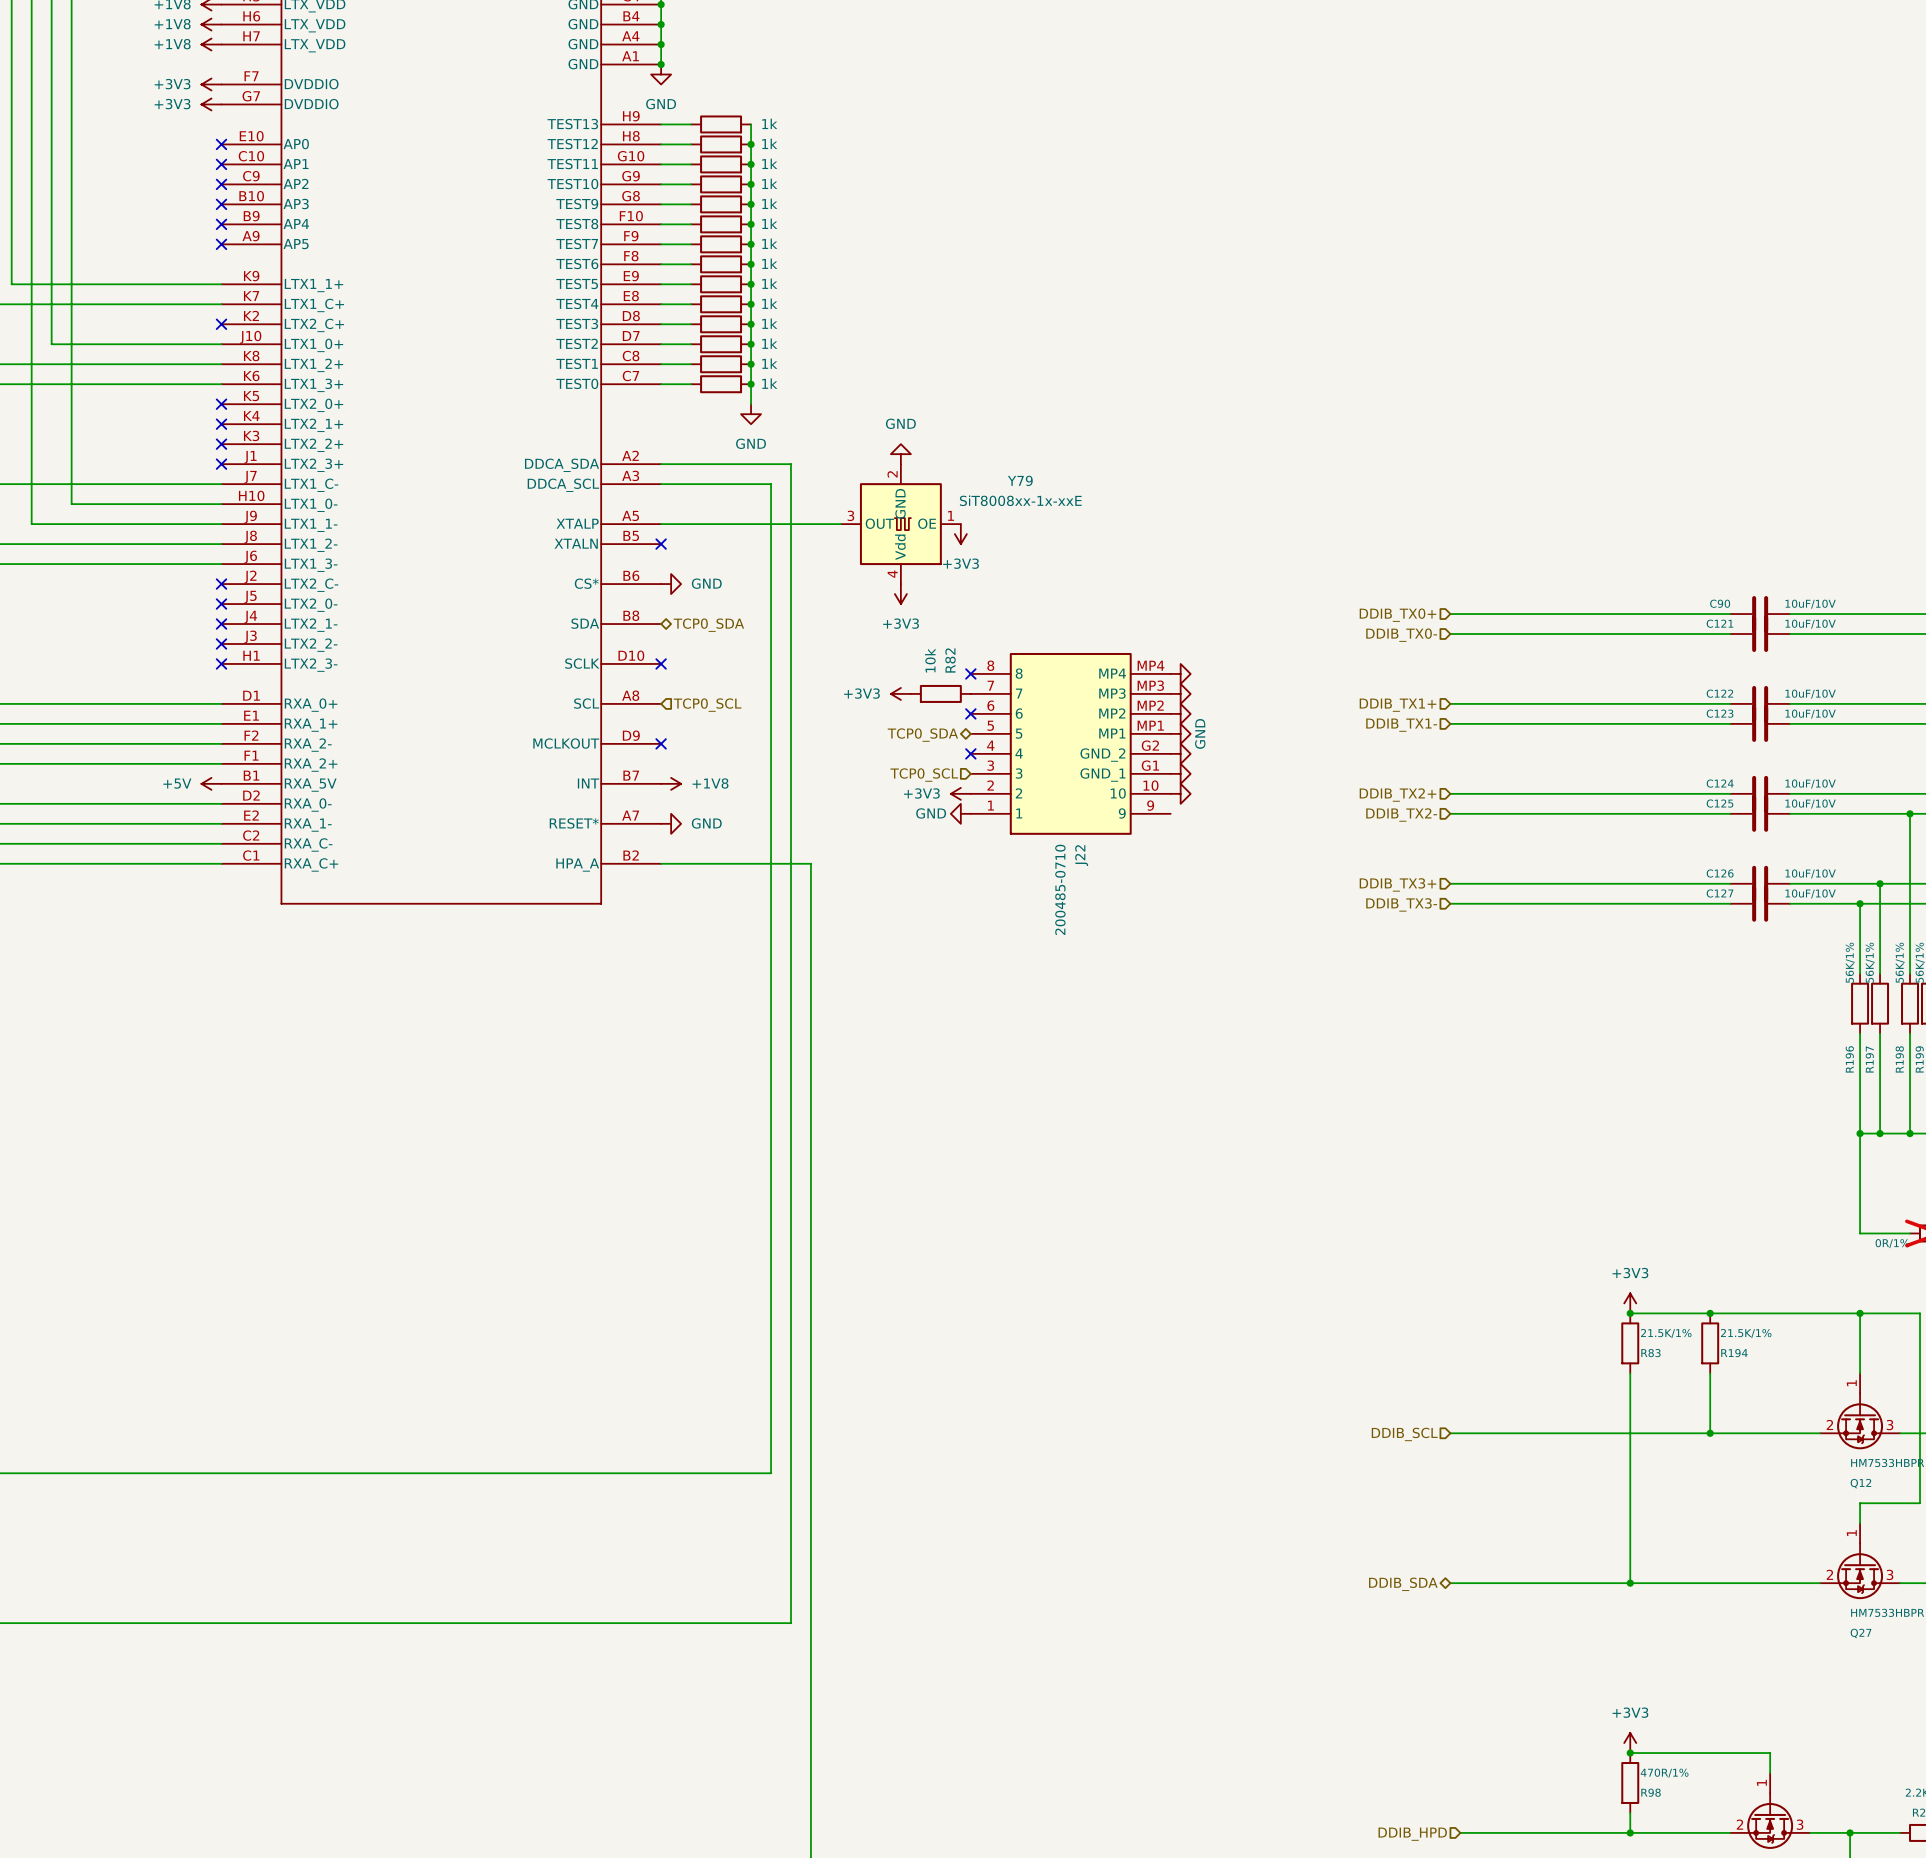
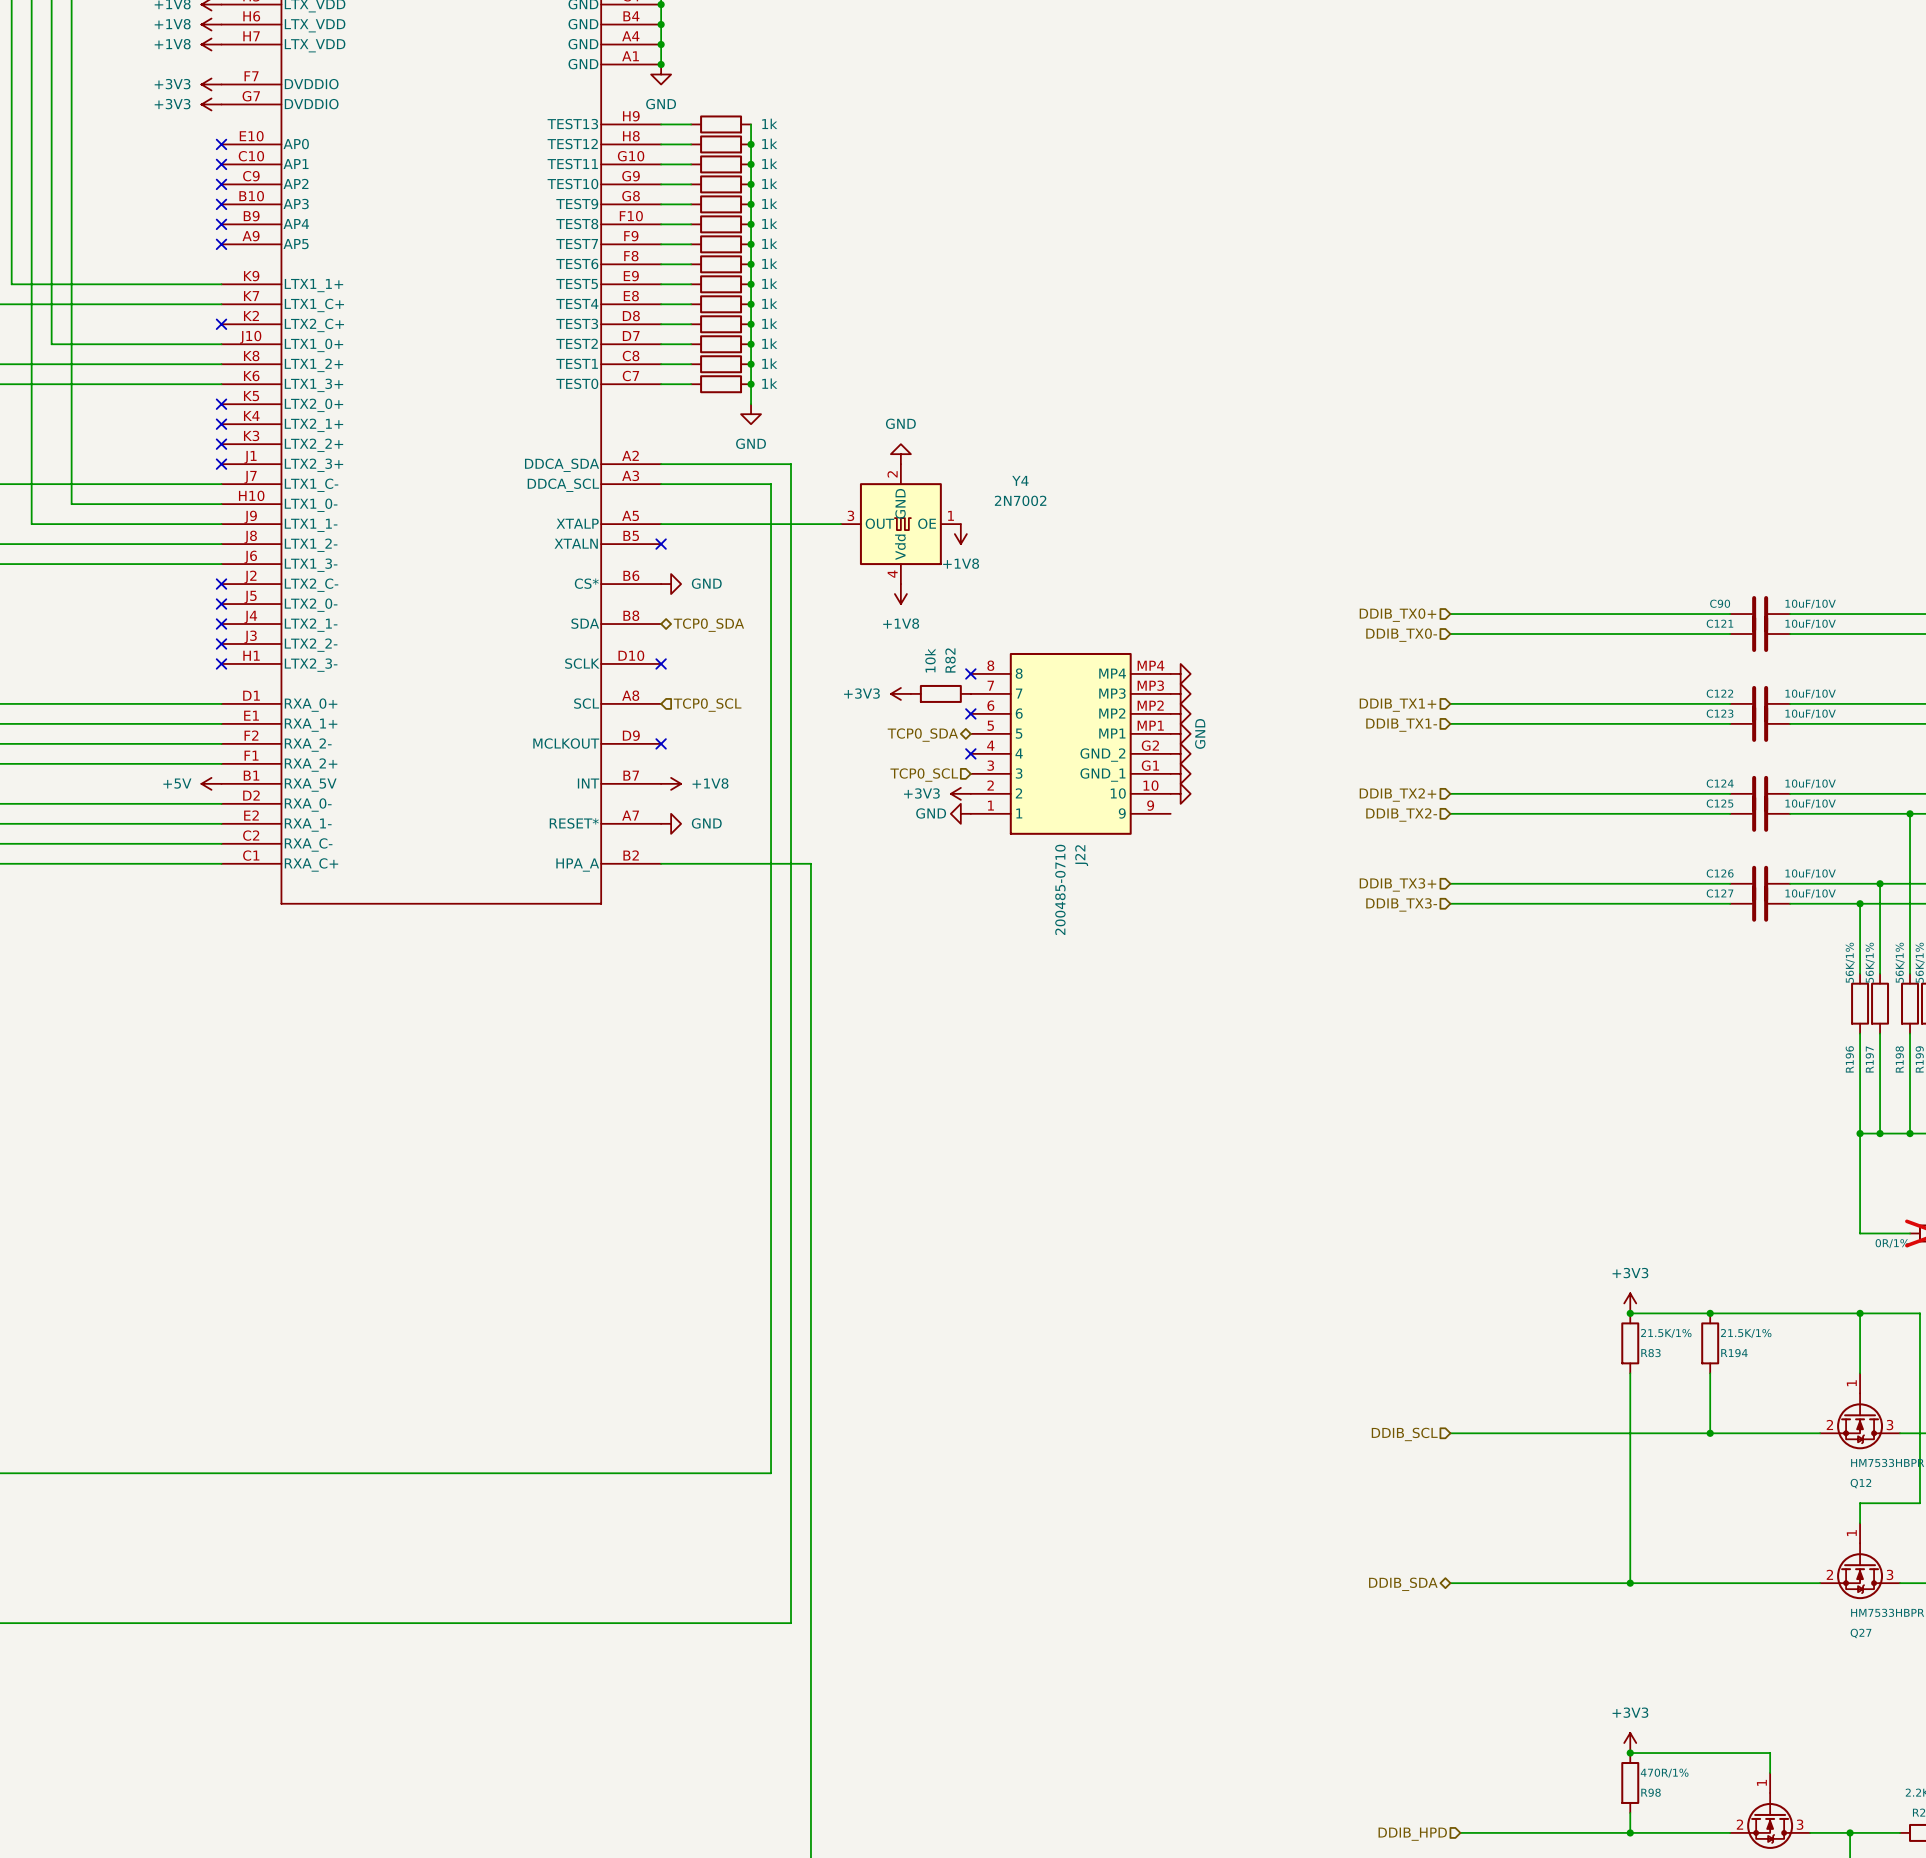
Y79 name: Y79 (1020, 480) -> Y4 (1020, 480)
Y79 value: SiT8008xx-1x-xxE (1020, 500) -> 2N7002 (1020, 500)
power symbol: +3V3 (960, 534) -> +1V8 (960, 534)
power symbol: +3V3 (900, 594) -> +1V8 (900, 594)

